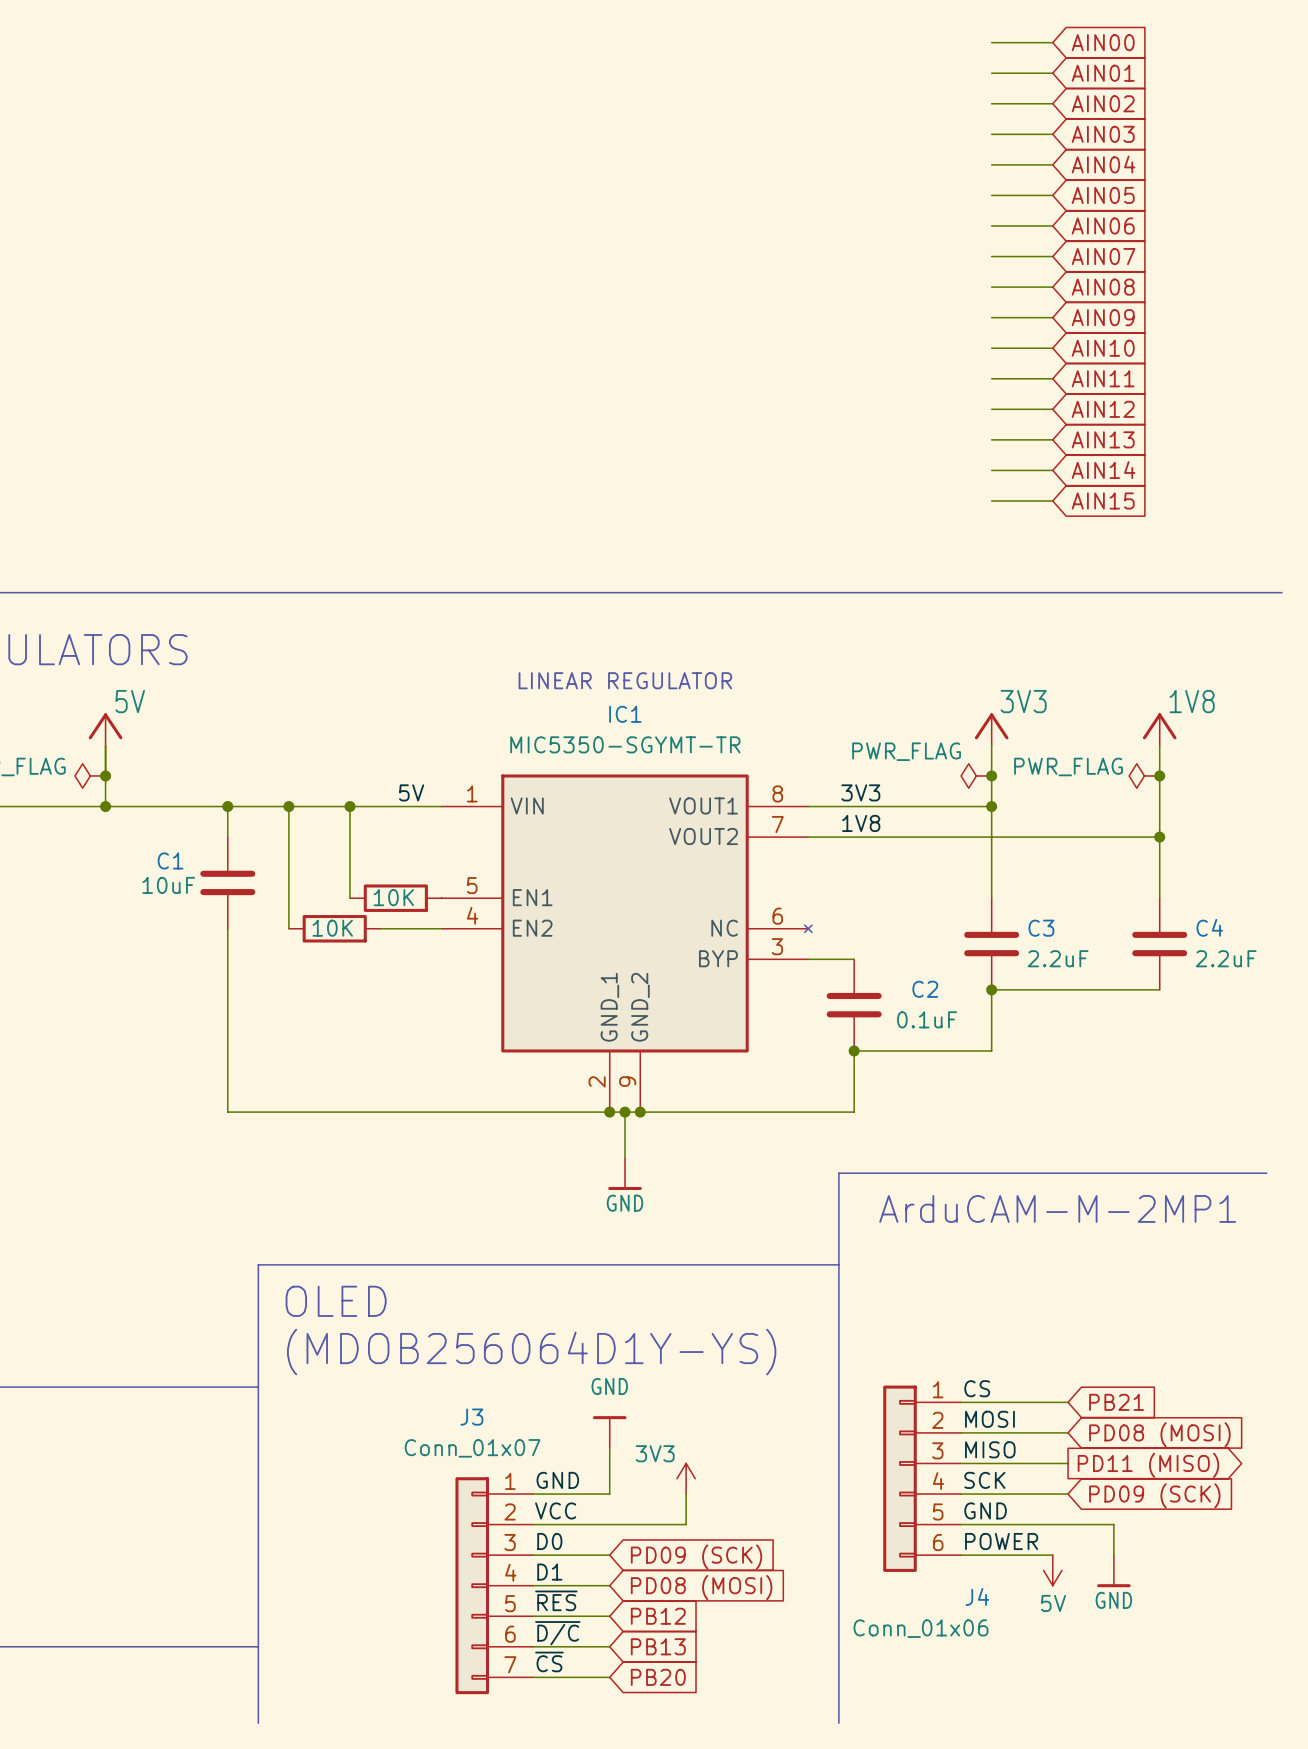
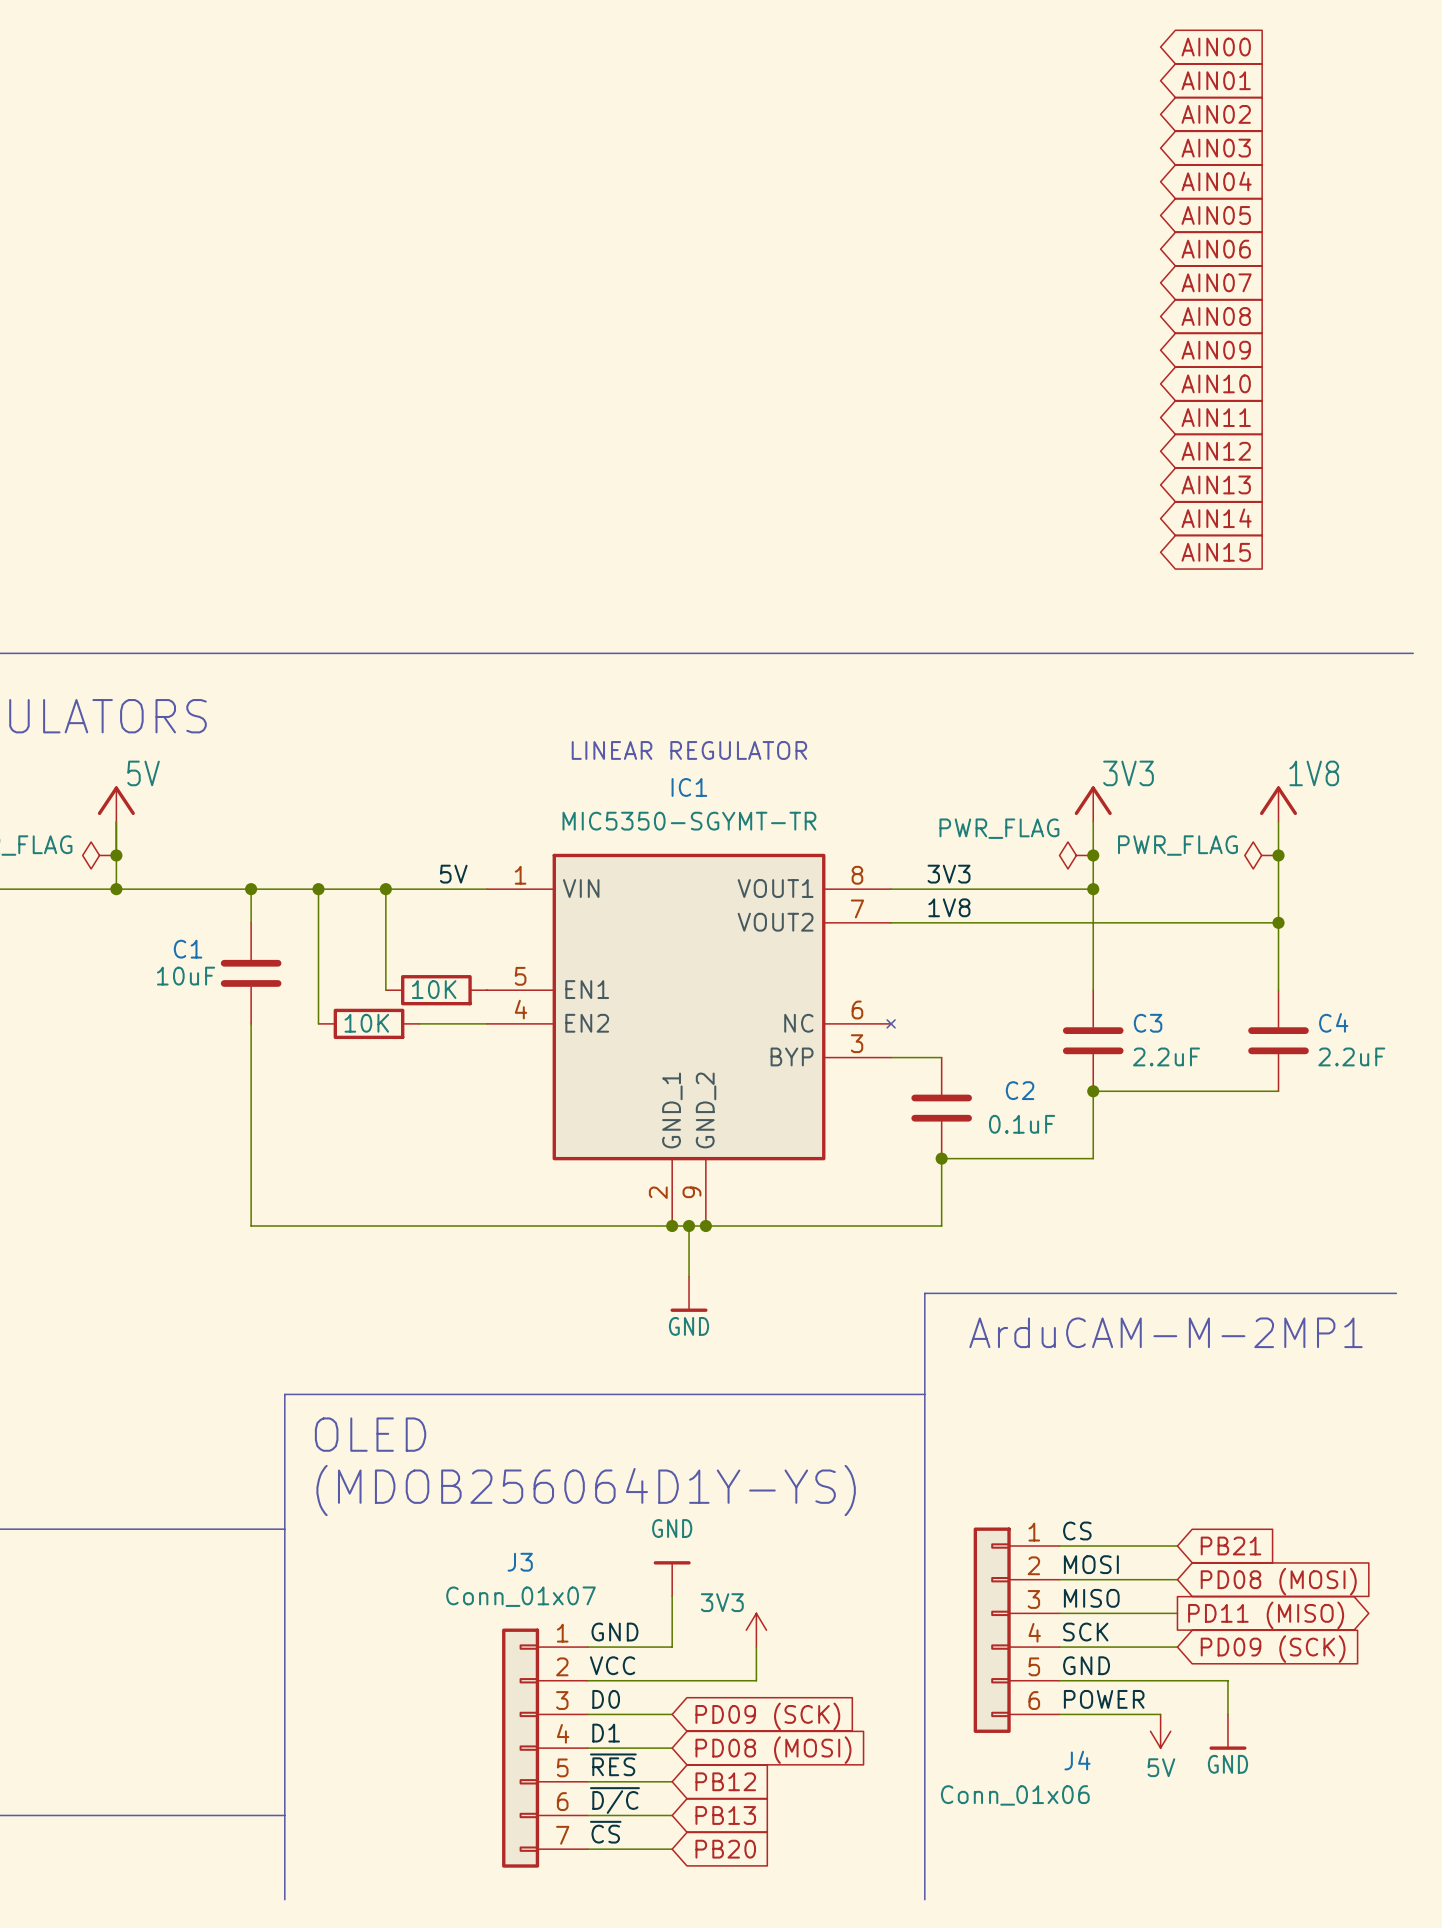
wire: (991, 42) (1052, 42) -> none
wire: (991, 73) (1052, 73) -> none
wire: (991, 103) (1052, 103) -> none
wire: (991, 134) (1052, 134) -> none
wire: (991, 164) (1052, 164) -> none
wire: (991, 195) (1052, 195) -> none
wire: (991, 225) (1052, 225) -> none
wire: (991, 256) (1052, 256) -> none
wire: (991, 287) (1052, 287) -> none
wire: (991, 317) (1052, 317) -> none
wire: (991, 348) (1052, 348) -> none
wire: (991, 378) (1052, 378) -> none
wire: (991, 409) (1052, 409) -> none
wire: (991, 439) (1052, 439) -> none
wire: (991, 470) (1052, 470) -> none
wire: (991, 500) (1052, 500) -> none

